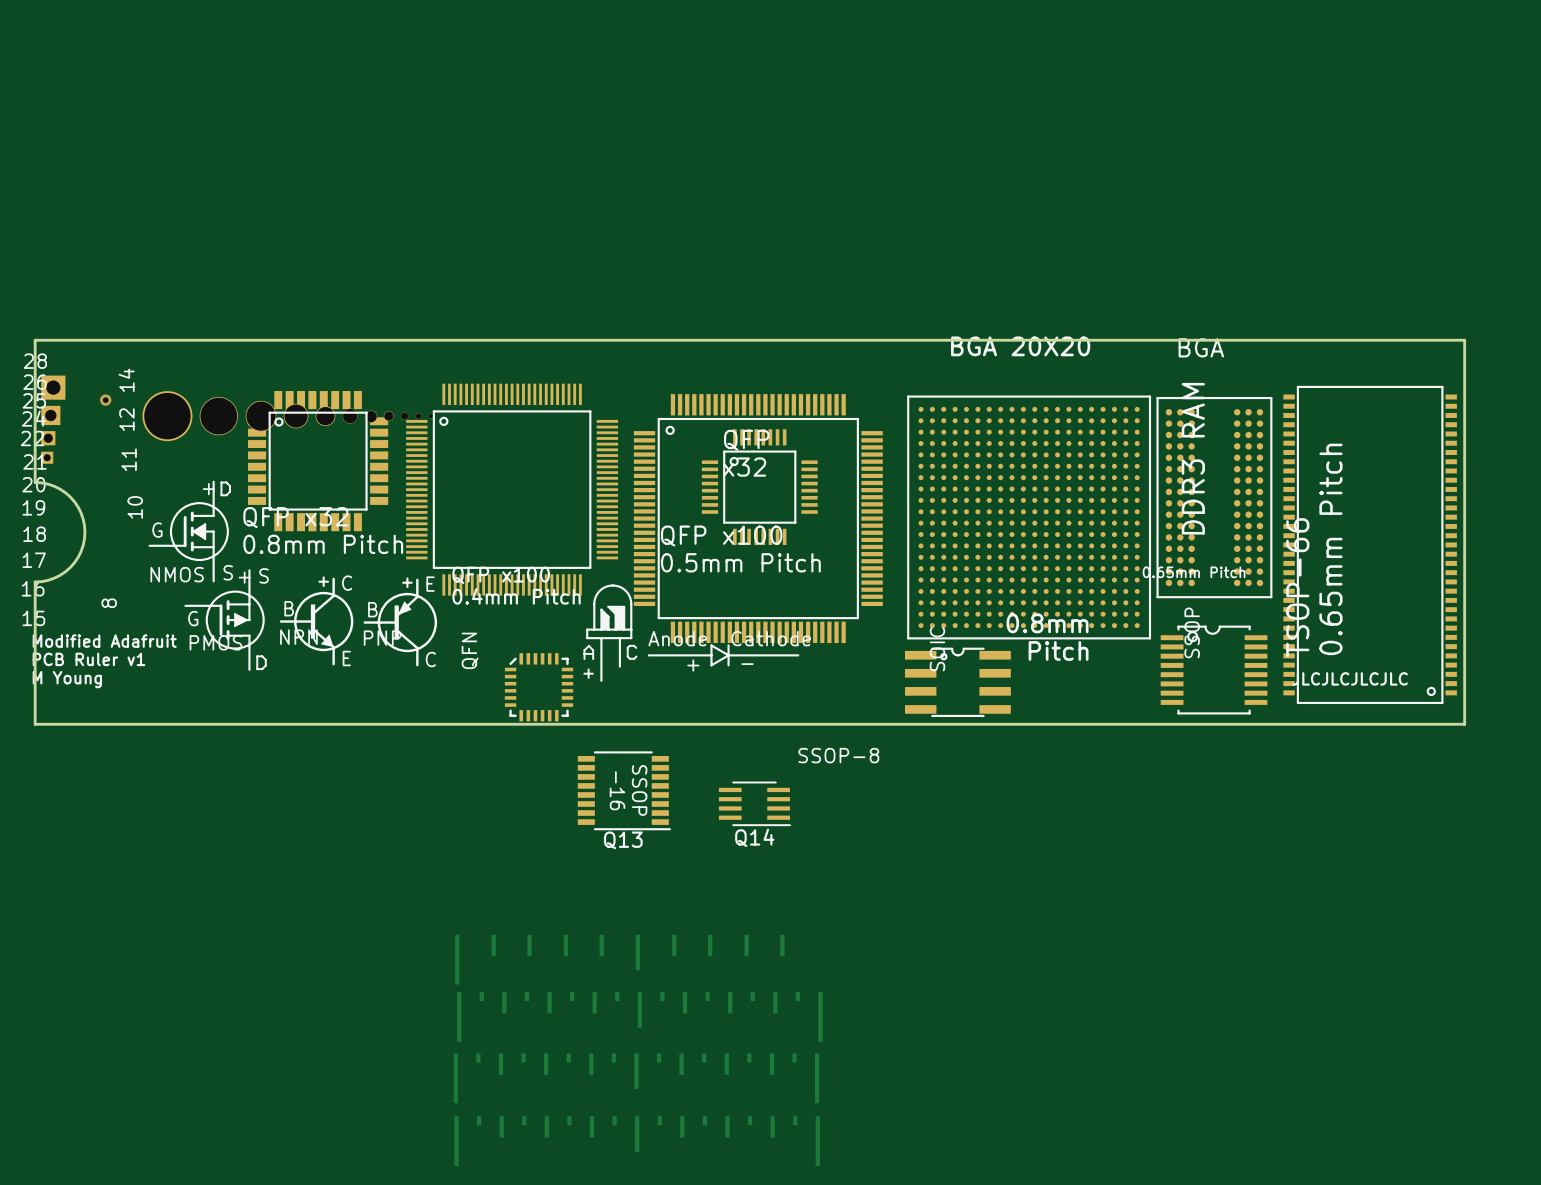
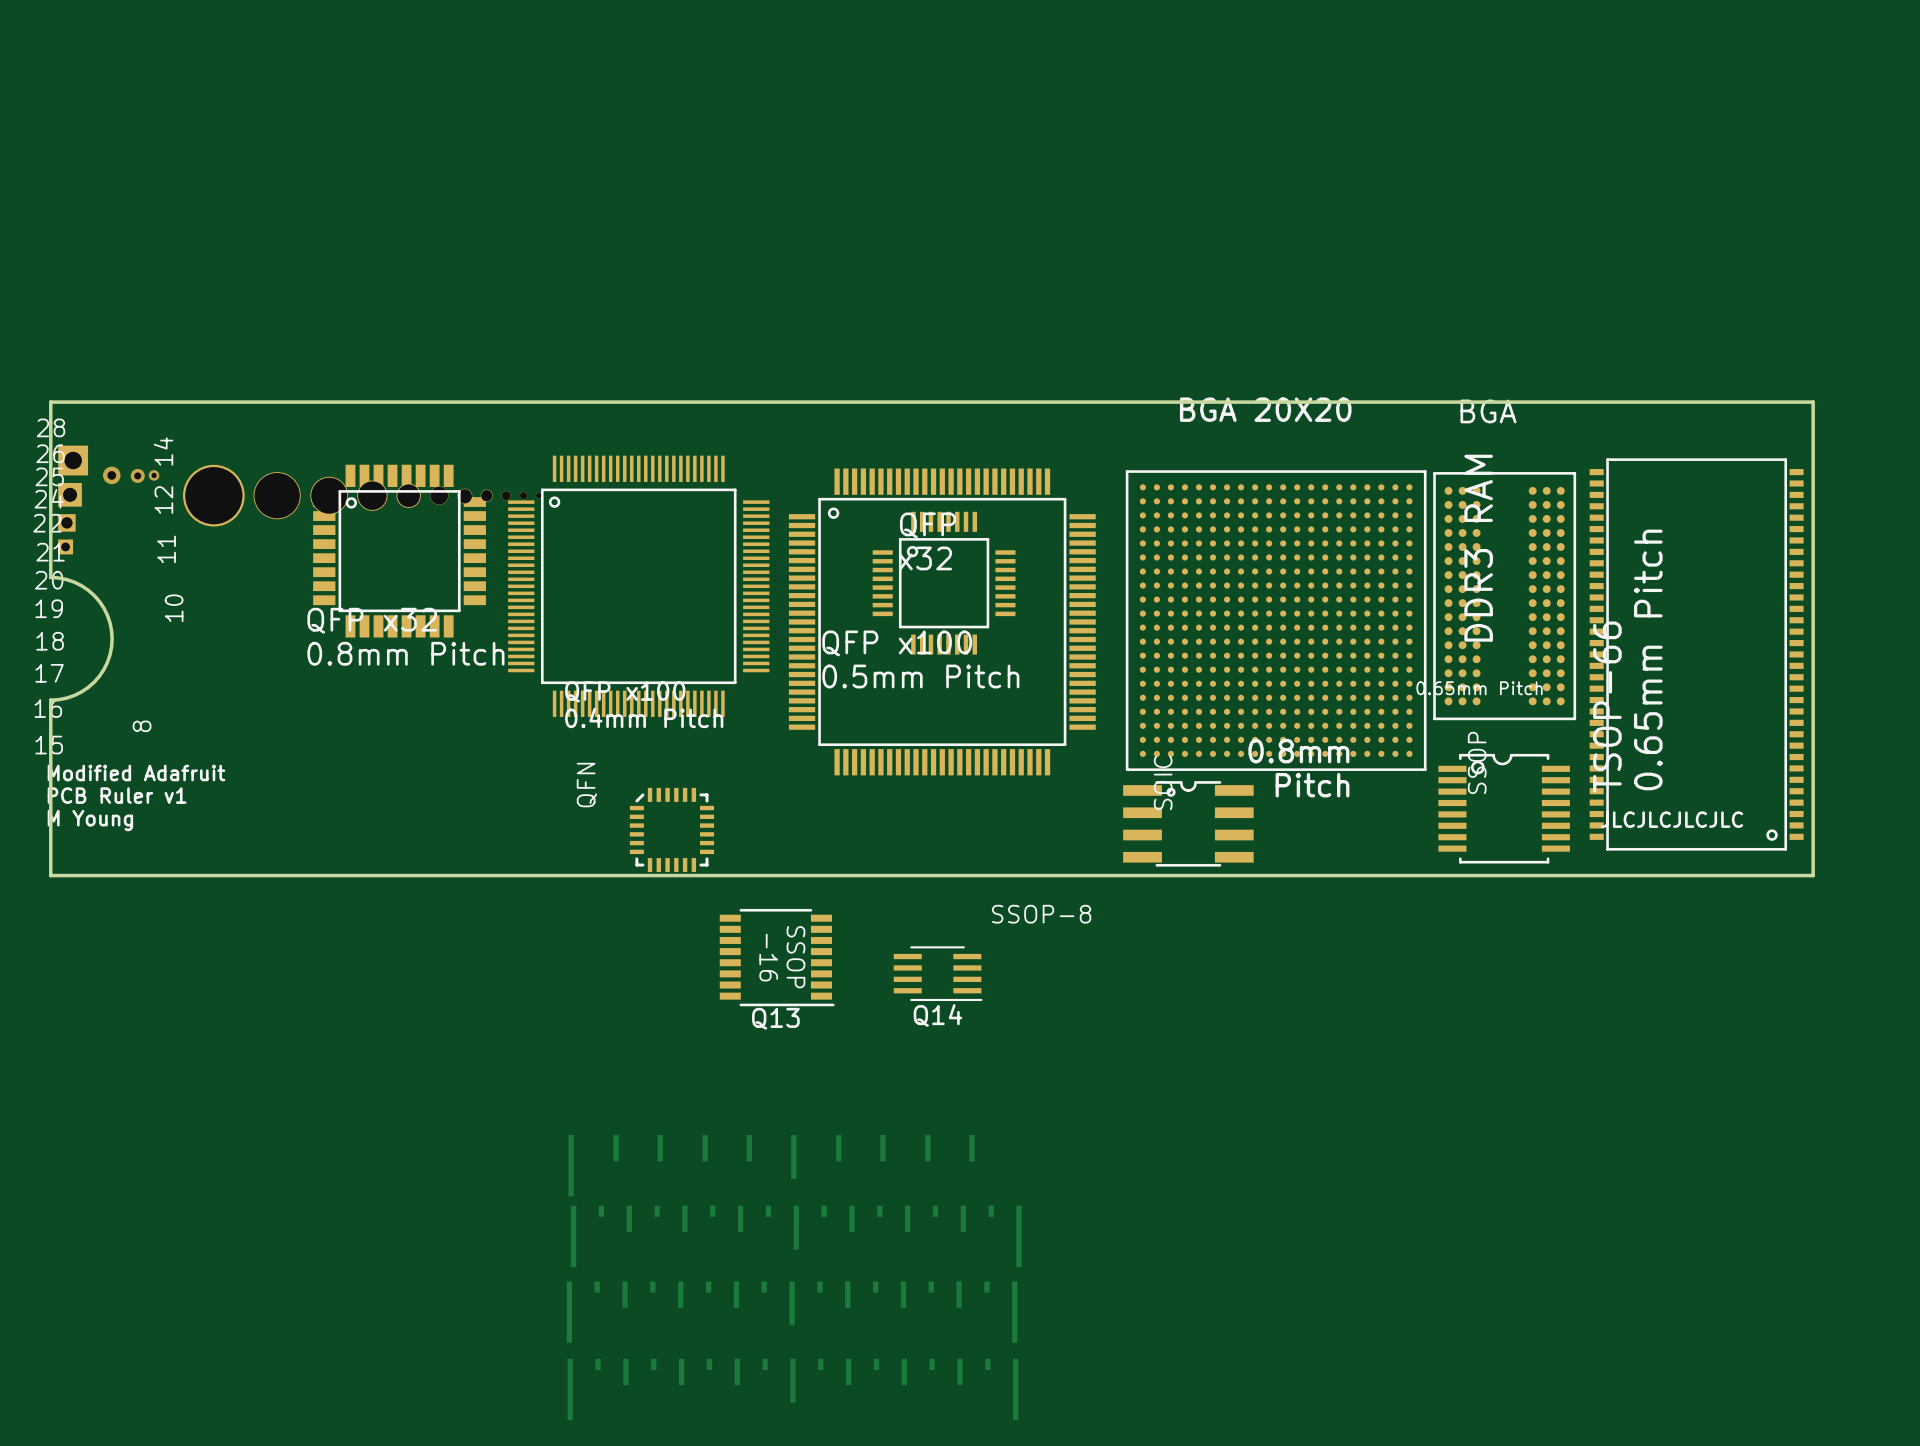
via: none -> (111, 475)
via: none -> (154, 475)
drawing: [148, 480, 438, 671] -> none
drawing: [583, 584, 800, 682] -> none

